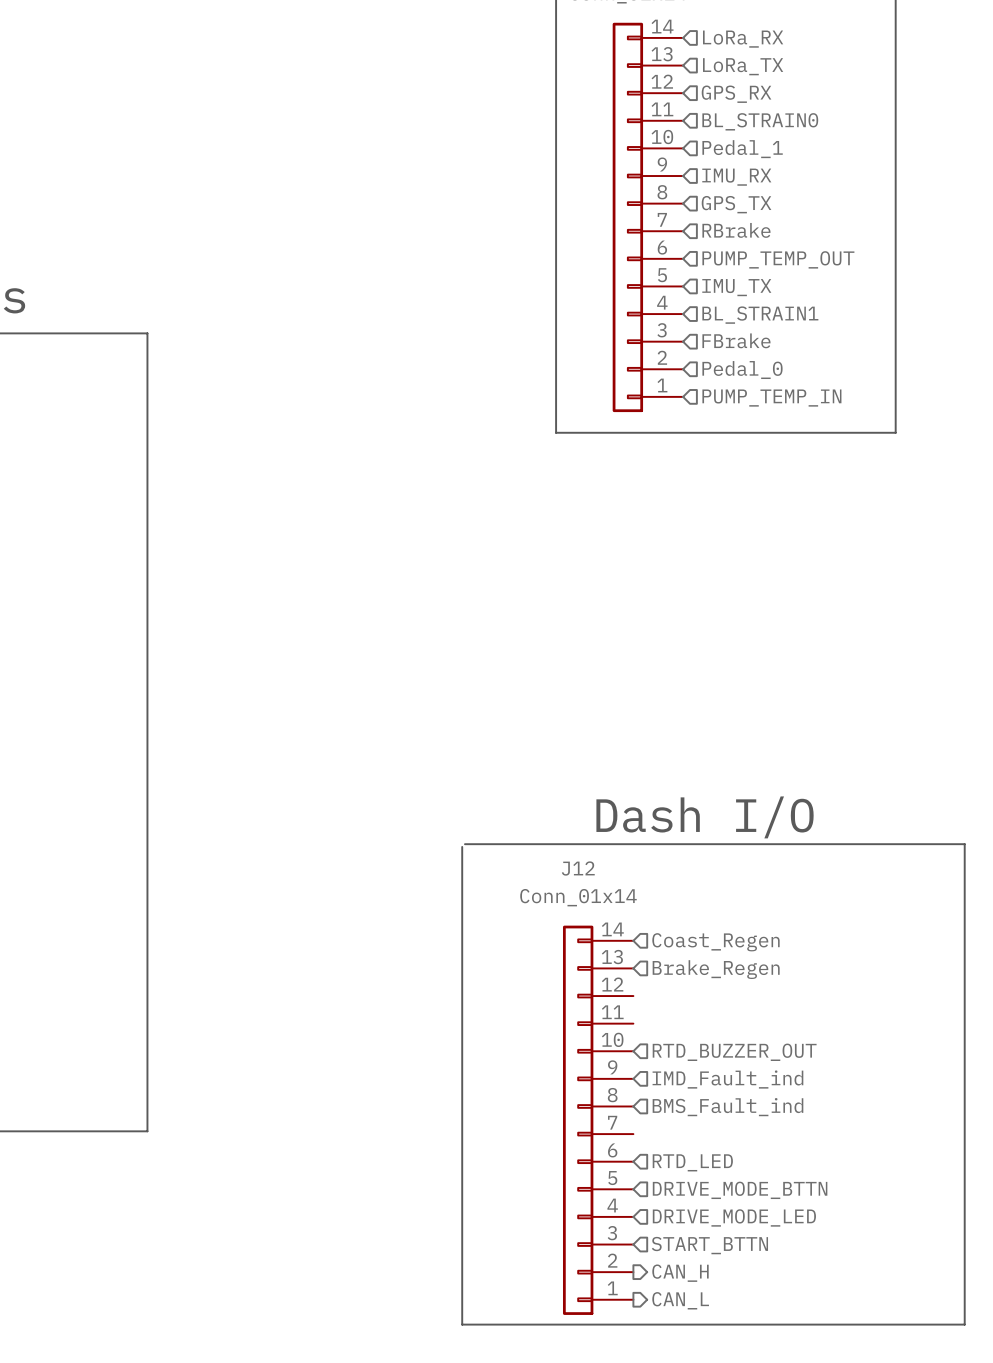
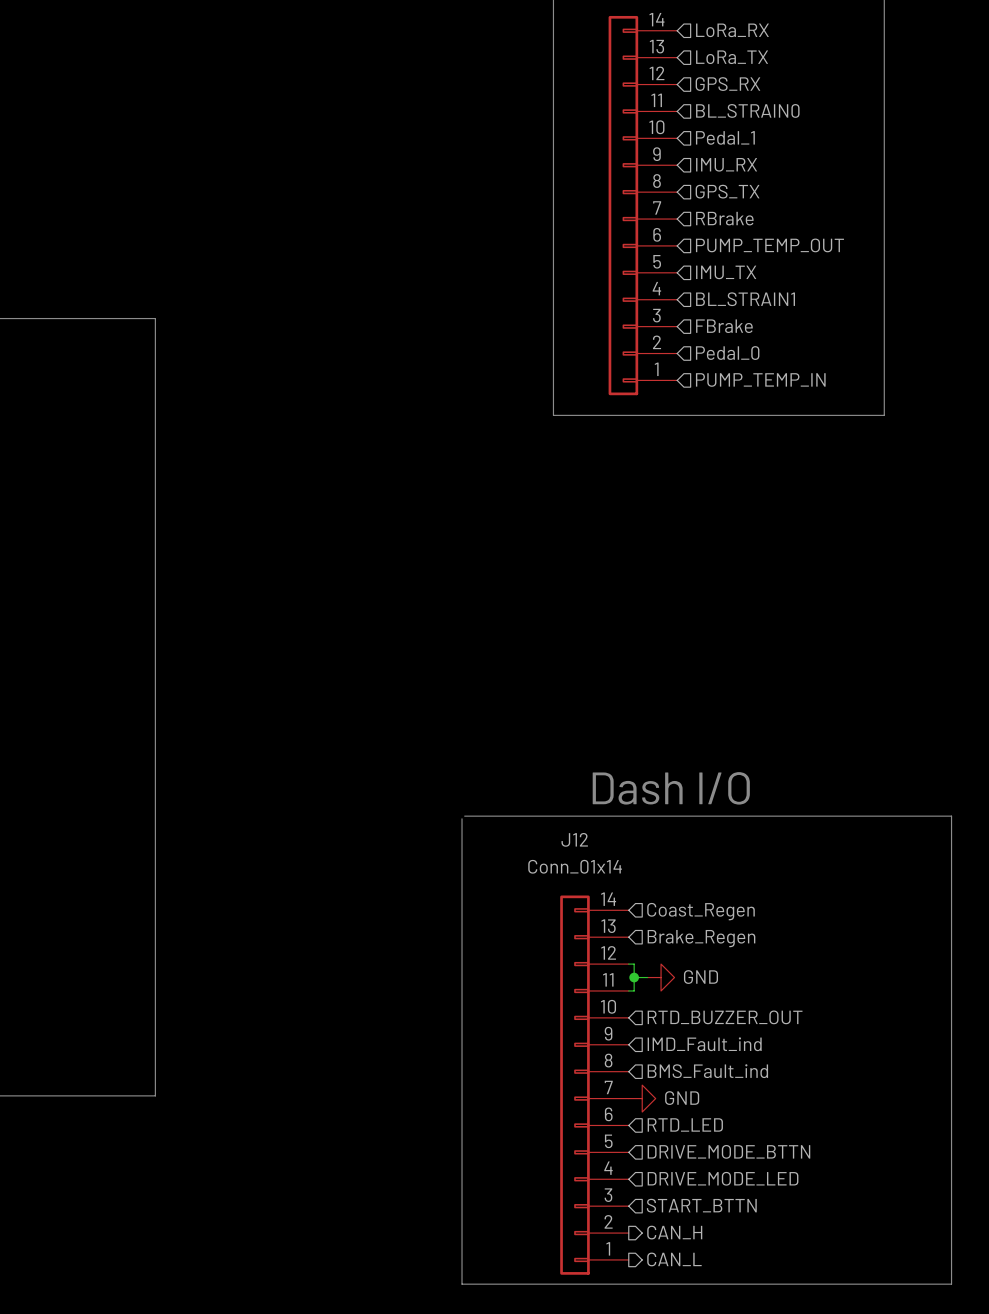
wire: none -> (628, 964) (634, 964) (634, 990) (628, 990)
wire: none -> (634, 977) (647, 977)
junction: none -> (634, 977)
power symbol: none -> GND (661, 977)
power symbol: none -> GND (642, 1098)

